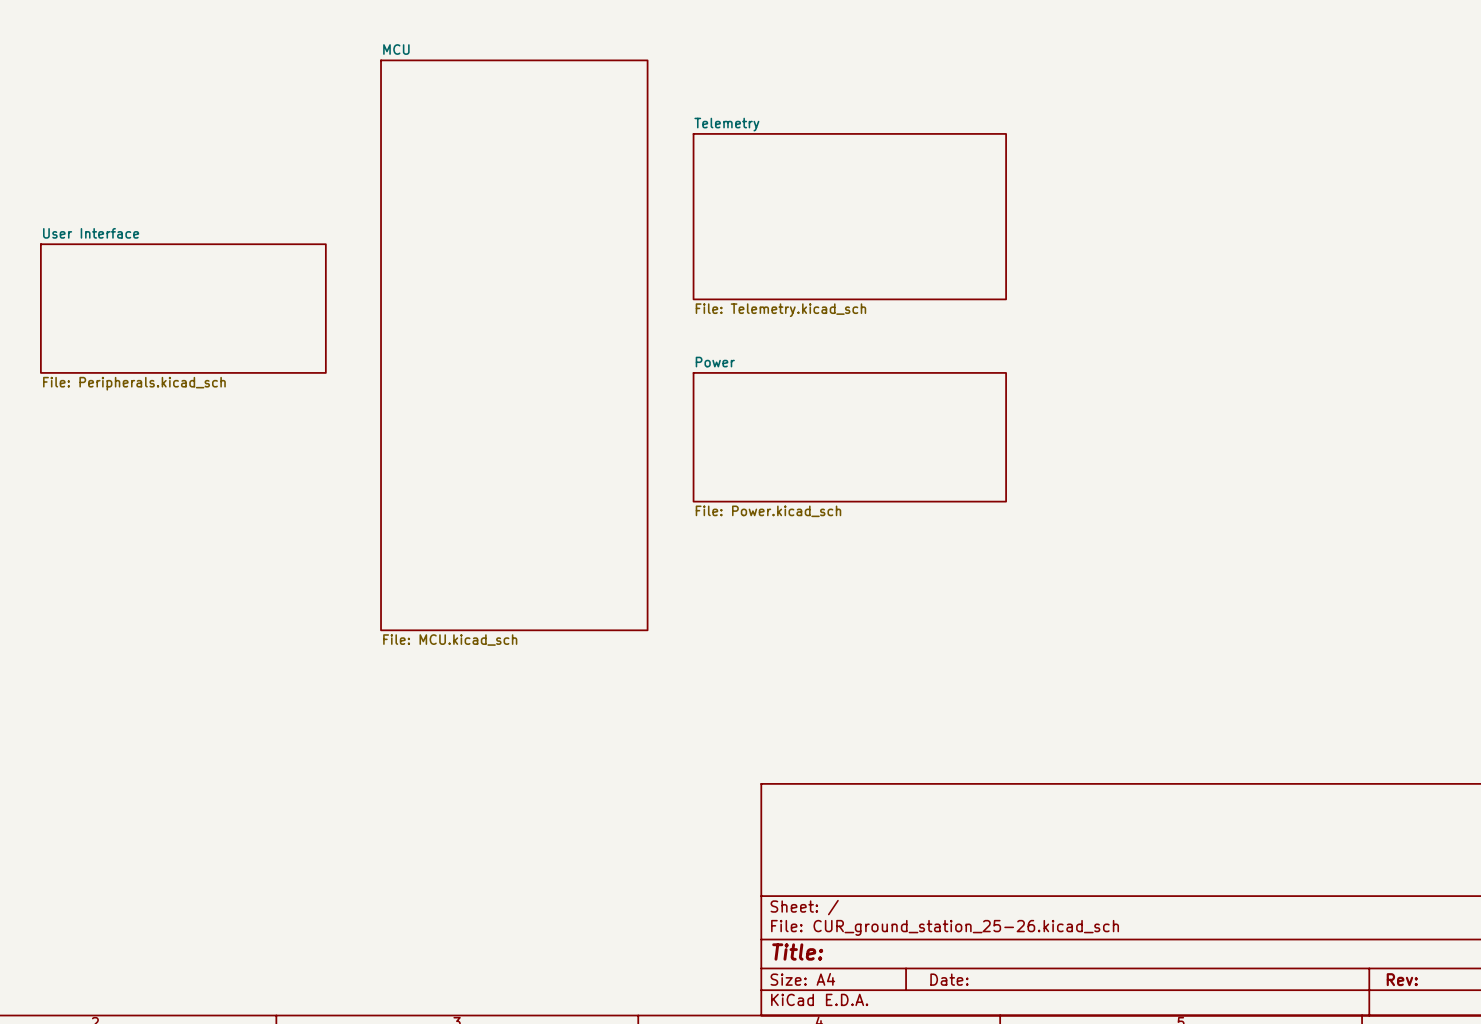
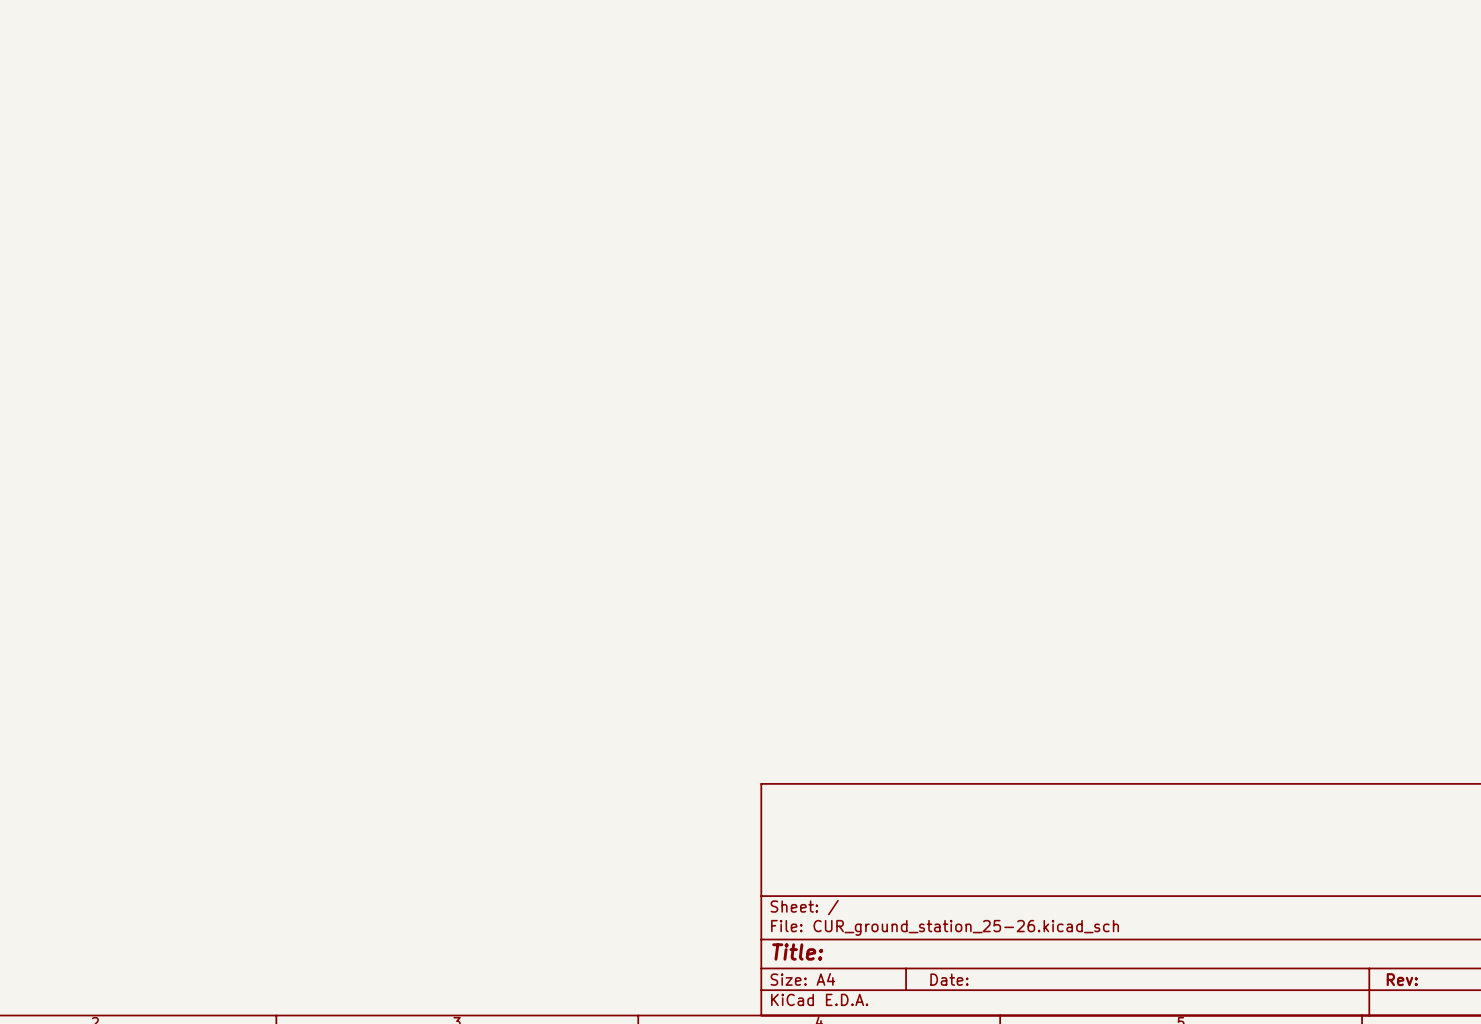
sheet Telemetry: File: Telemetry.kicad_sch (849, 216) -> none
sheet User Interface: File: Peripherals.kicad_sch (183, 308) -> none
sheet MCU: File: MCU.kicad_sch (514, 345) -> none
sheet Power: File: Power.kicad_sch (849, 437) -> none

